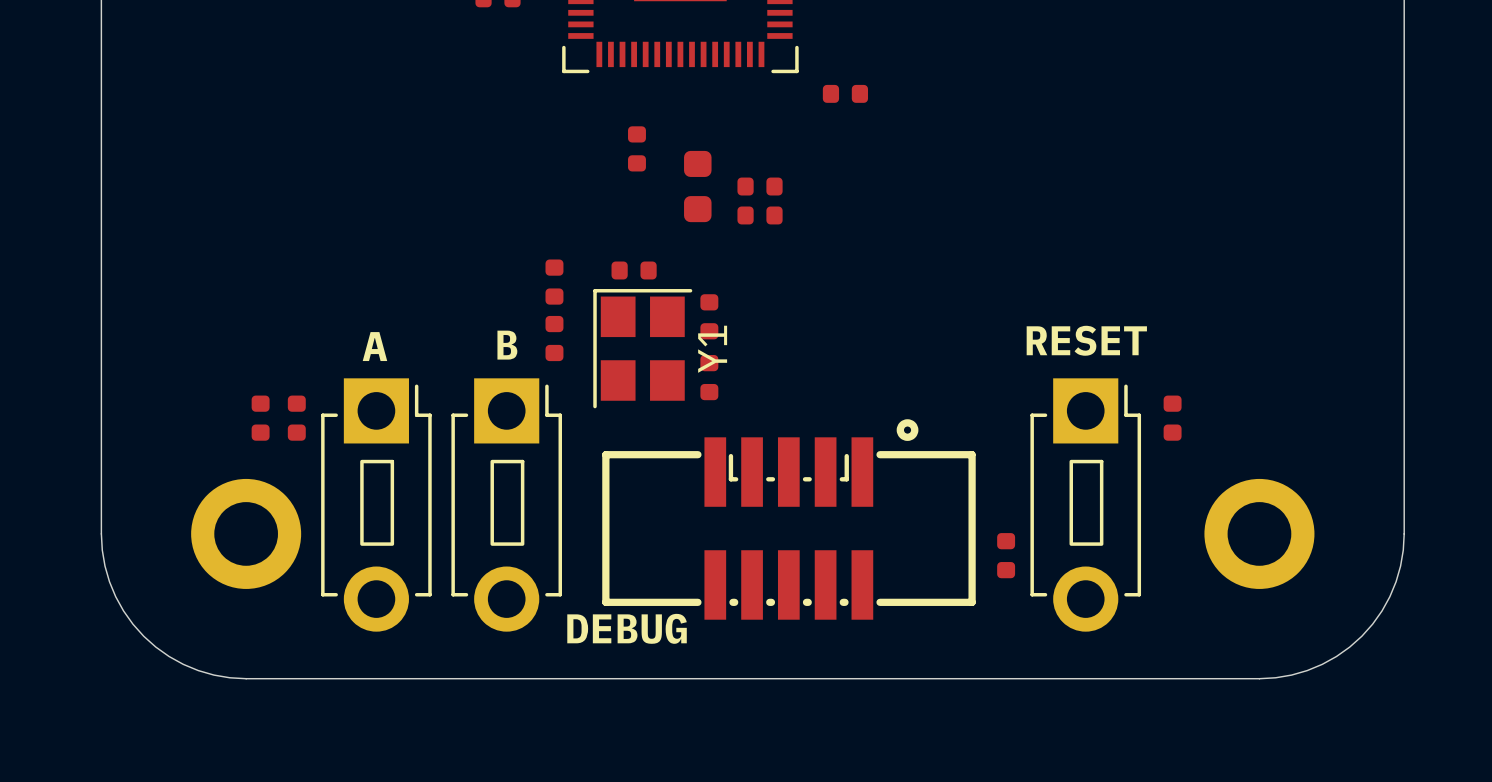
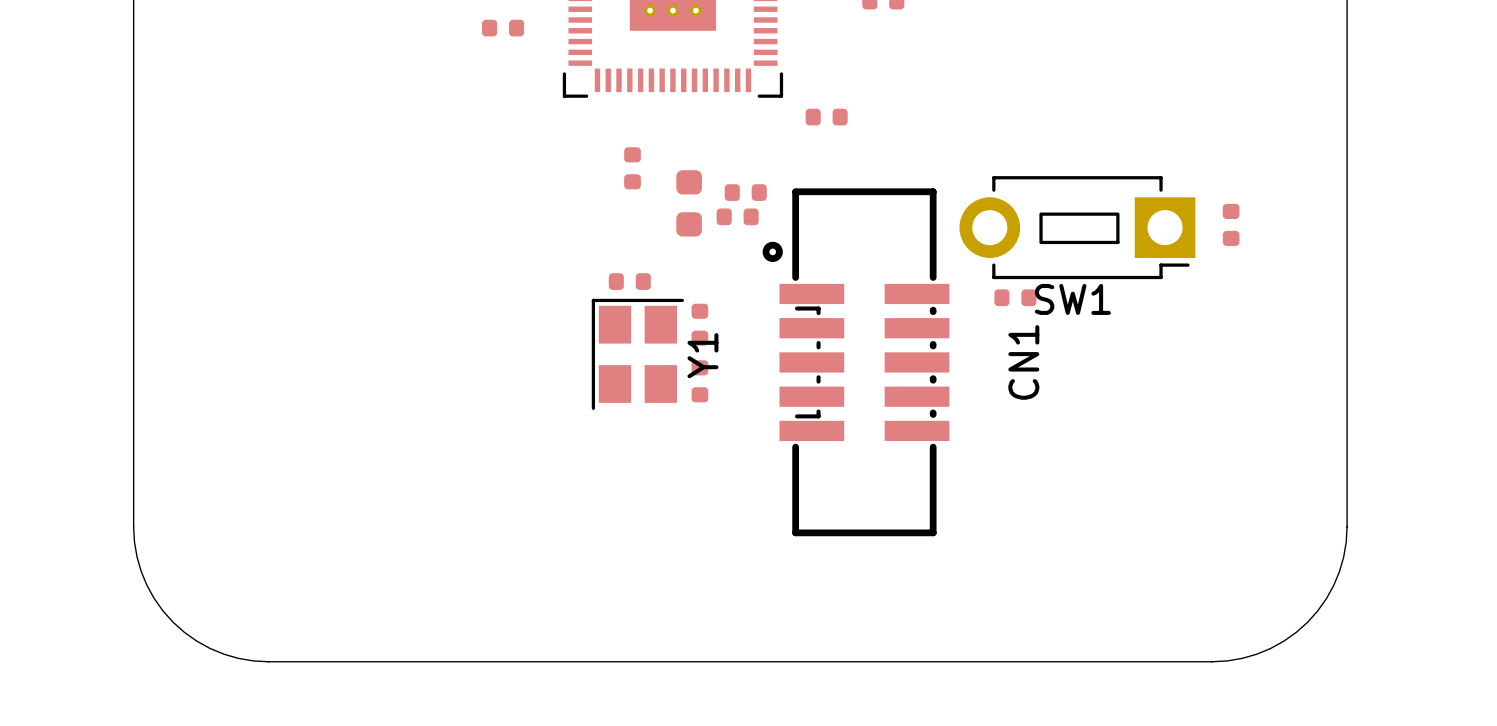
part: none -> (745, 192)
part: (760, 186) -> none
part: none -> (737, 216)
part: none -> (1231, 224)
SW1: none -> (1077, 227)
part: (760, 215) -> none
part: (554, 282) -> none
part: none -> (1015, 297)
part: (554, 338) -> none
text: RESET (1086, 340) -> none
text: B (507, 345) -> none
text: A (374, 346) -> none
CN1: none -> (855, 362)
part: (260, 418) -> none
part: (296, 418) -> none
part: (1172, 418) -> none
part: (376, 504) -> none
part: (506, 504) -> none
part: (1085, 504) -> none
part: (788, 519) -> none
part: (246, 533) -> none
part: (1259, 533) -> none
part: (1006, 555) -> none
text: DEBUG (627, 628) -> none

